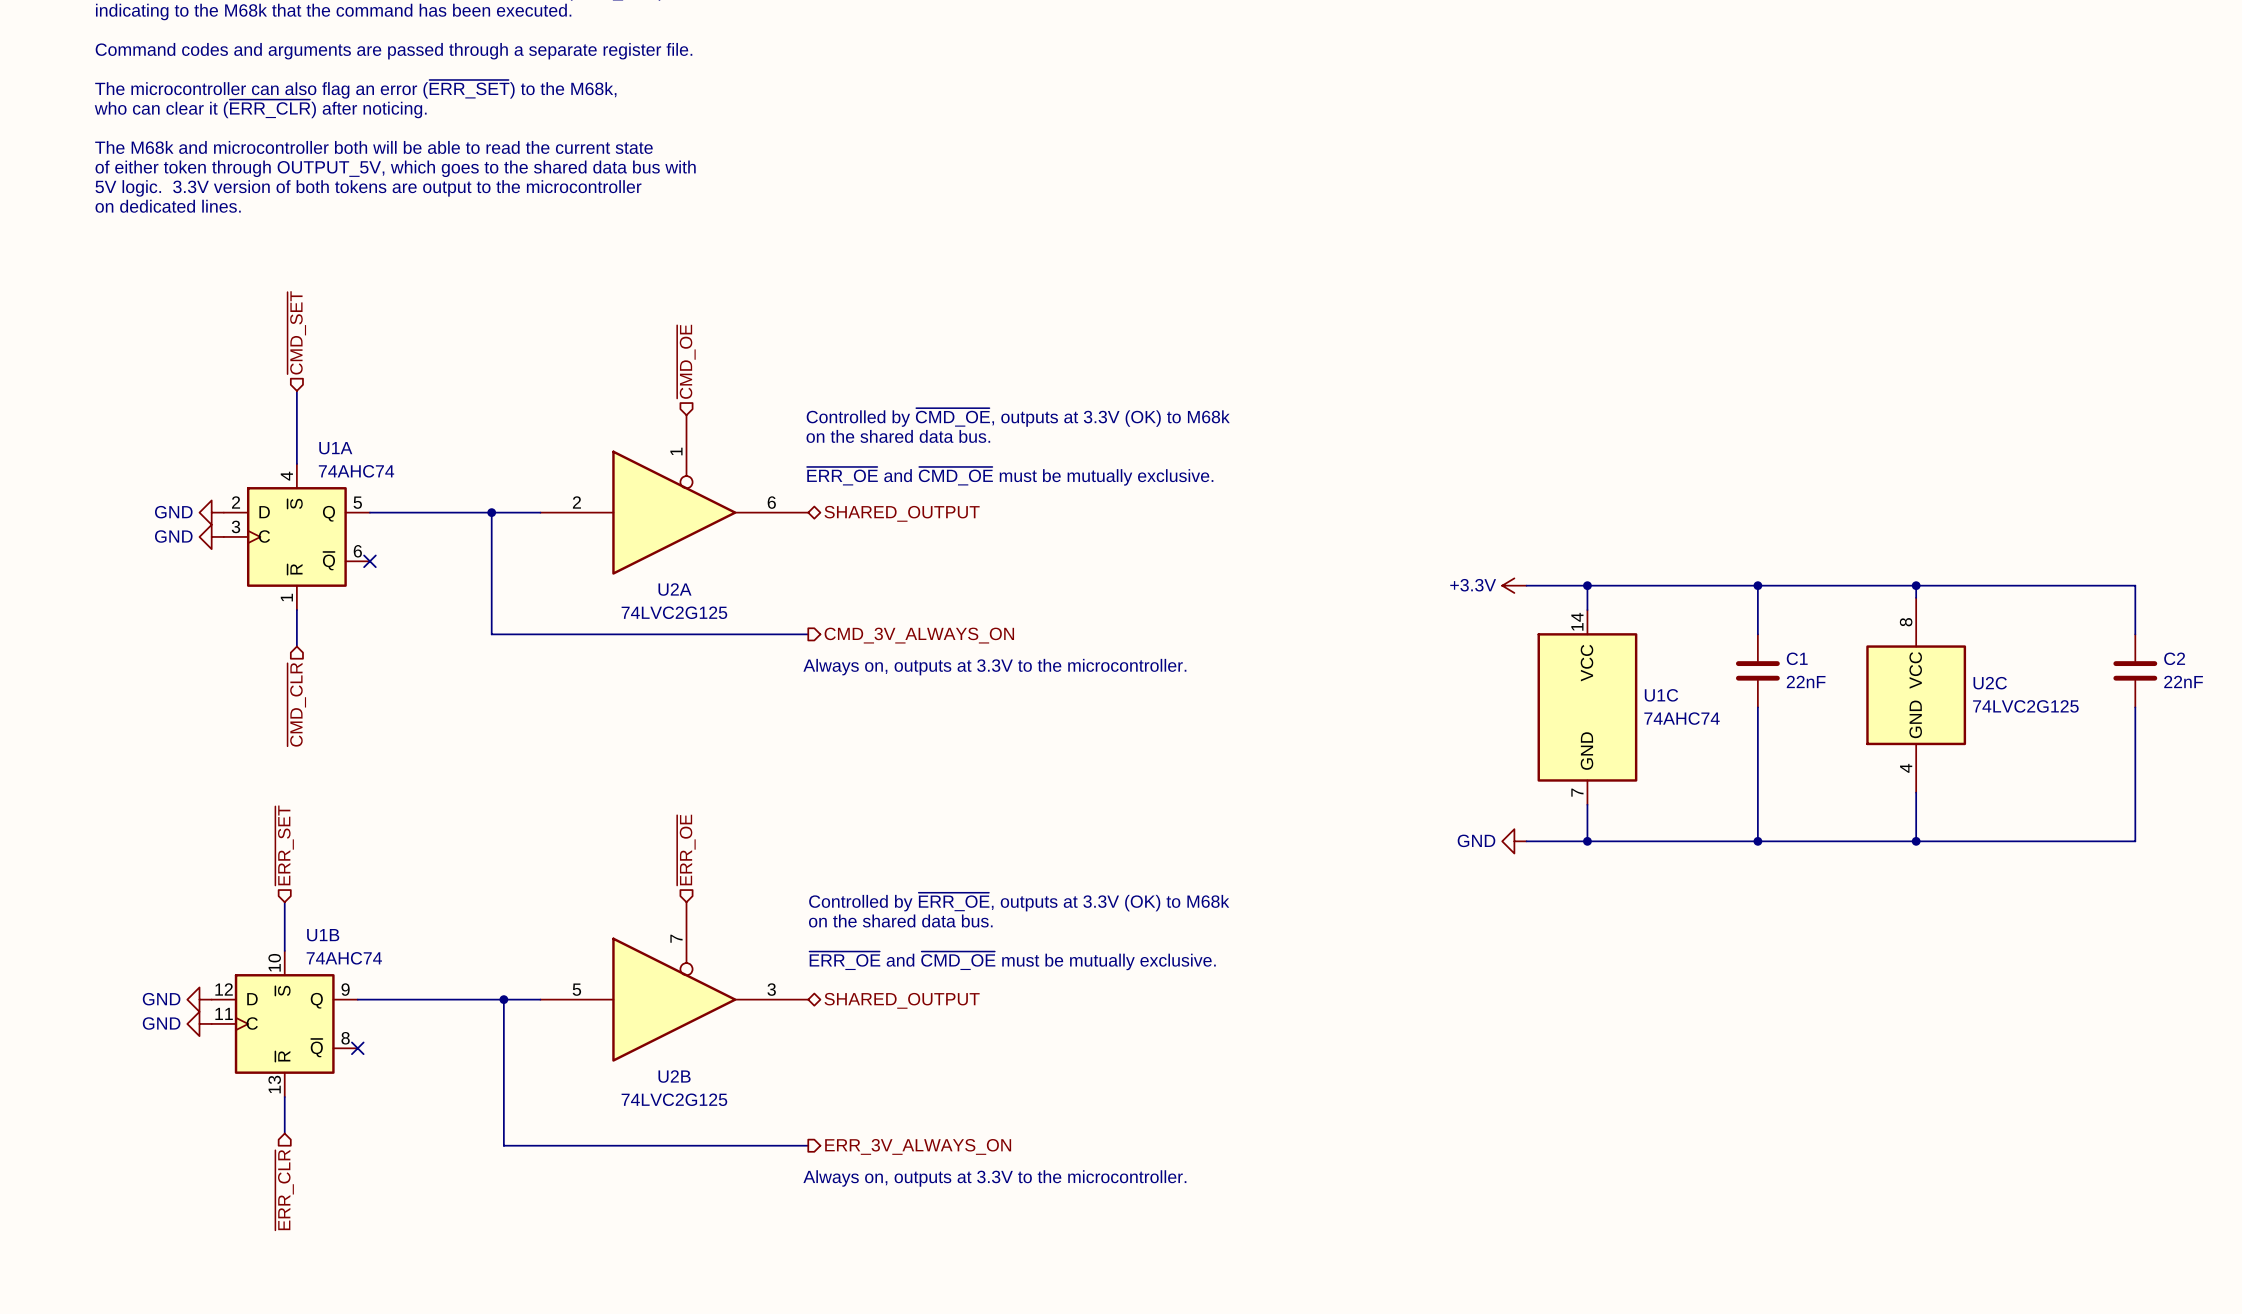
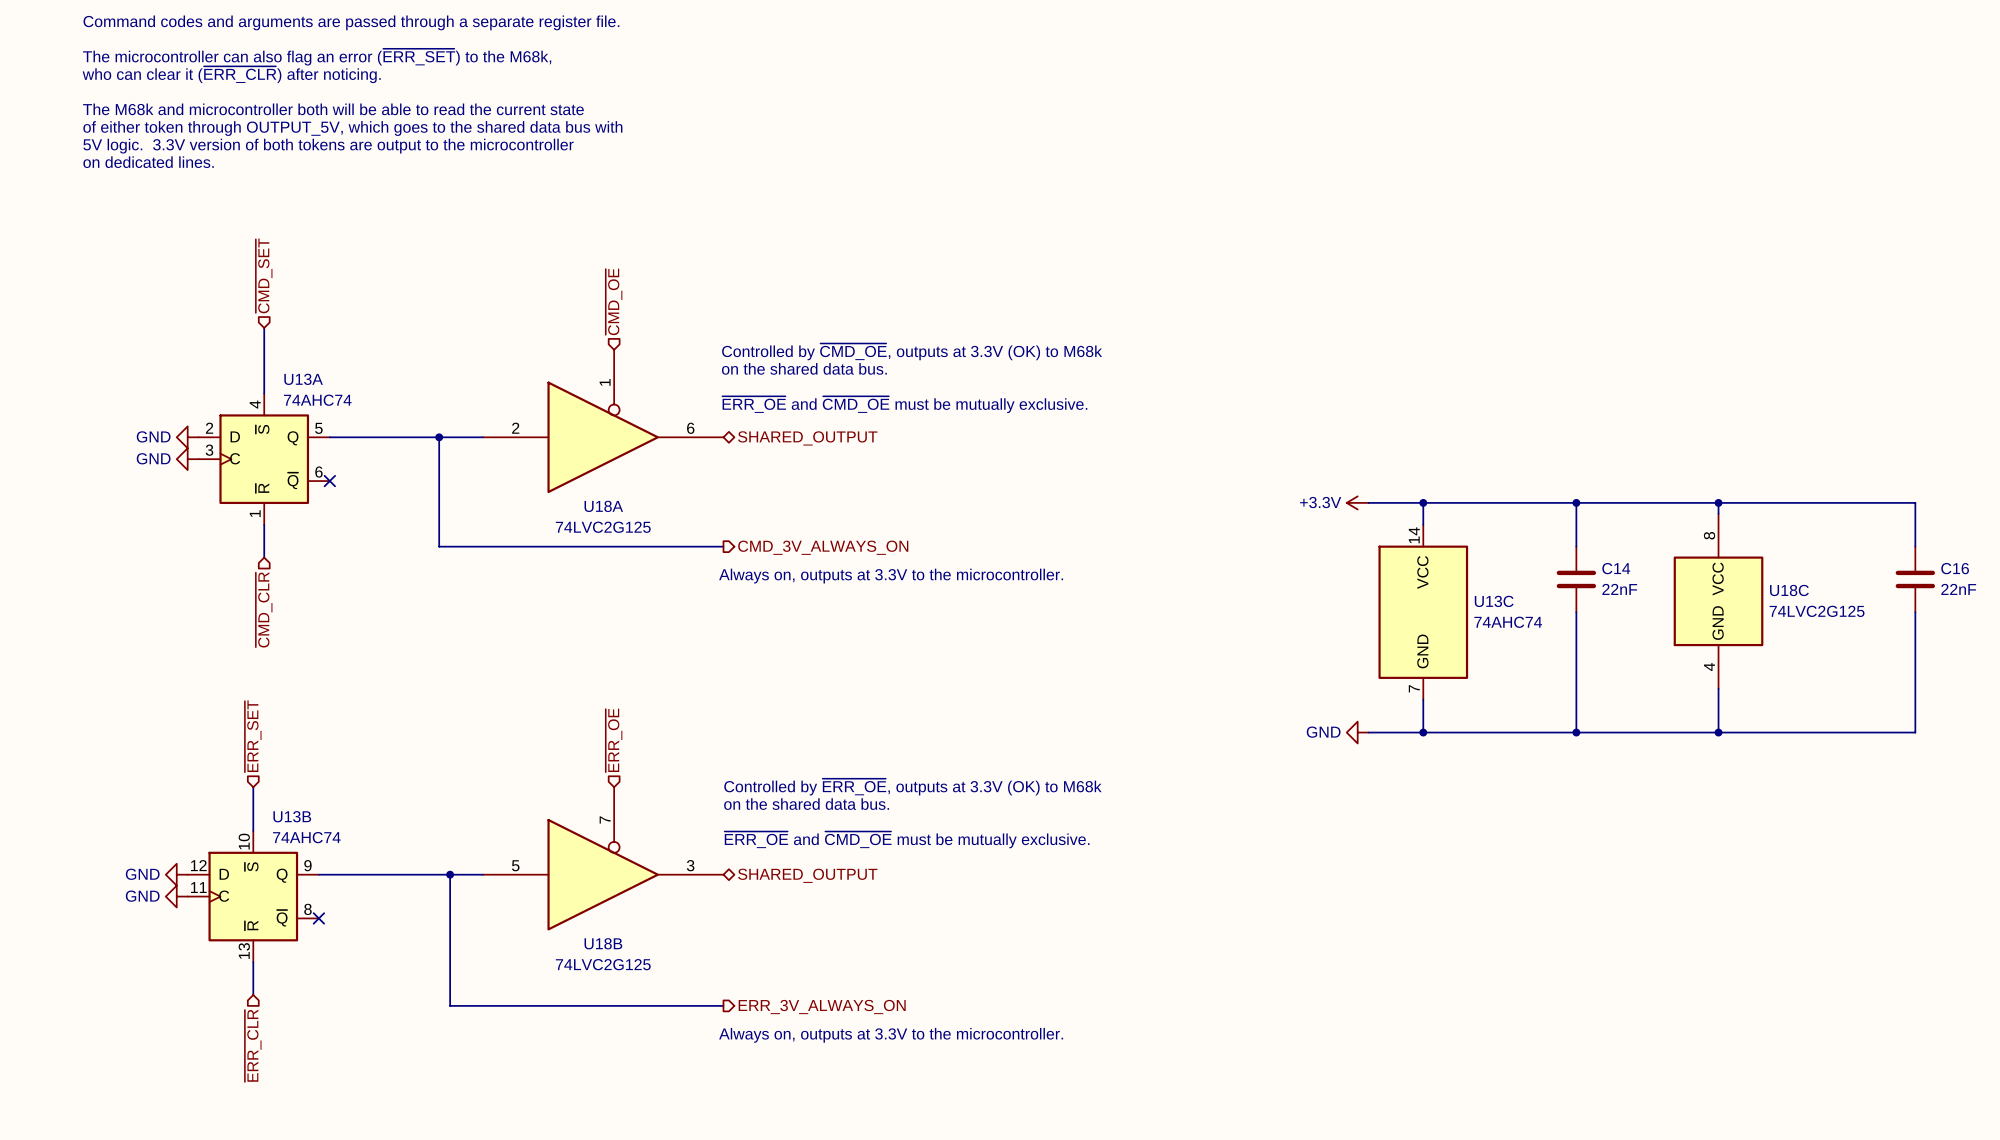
U1A name: U1A (335, 448) -> U13A (303, 379)
U2A name: U2A (674, 589) -> U18A (603, 506)
C1 name: C1 (1797, 658) -> C14 (1616, 568)
C2 name: C2 (2174, 658) -> C16 (1955, 568)
U2C name: U2C (1990, 683) -> U18C (1789, 590)
U1C name: U1C (1661, 695) -> U13C (1494, 601)
U1B name: U1B (323, 935) -> U13B (292, 816)
U2B name: U2B (674, 1076) -> U18B (603, 943)

